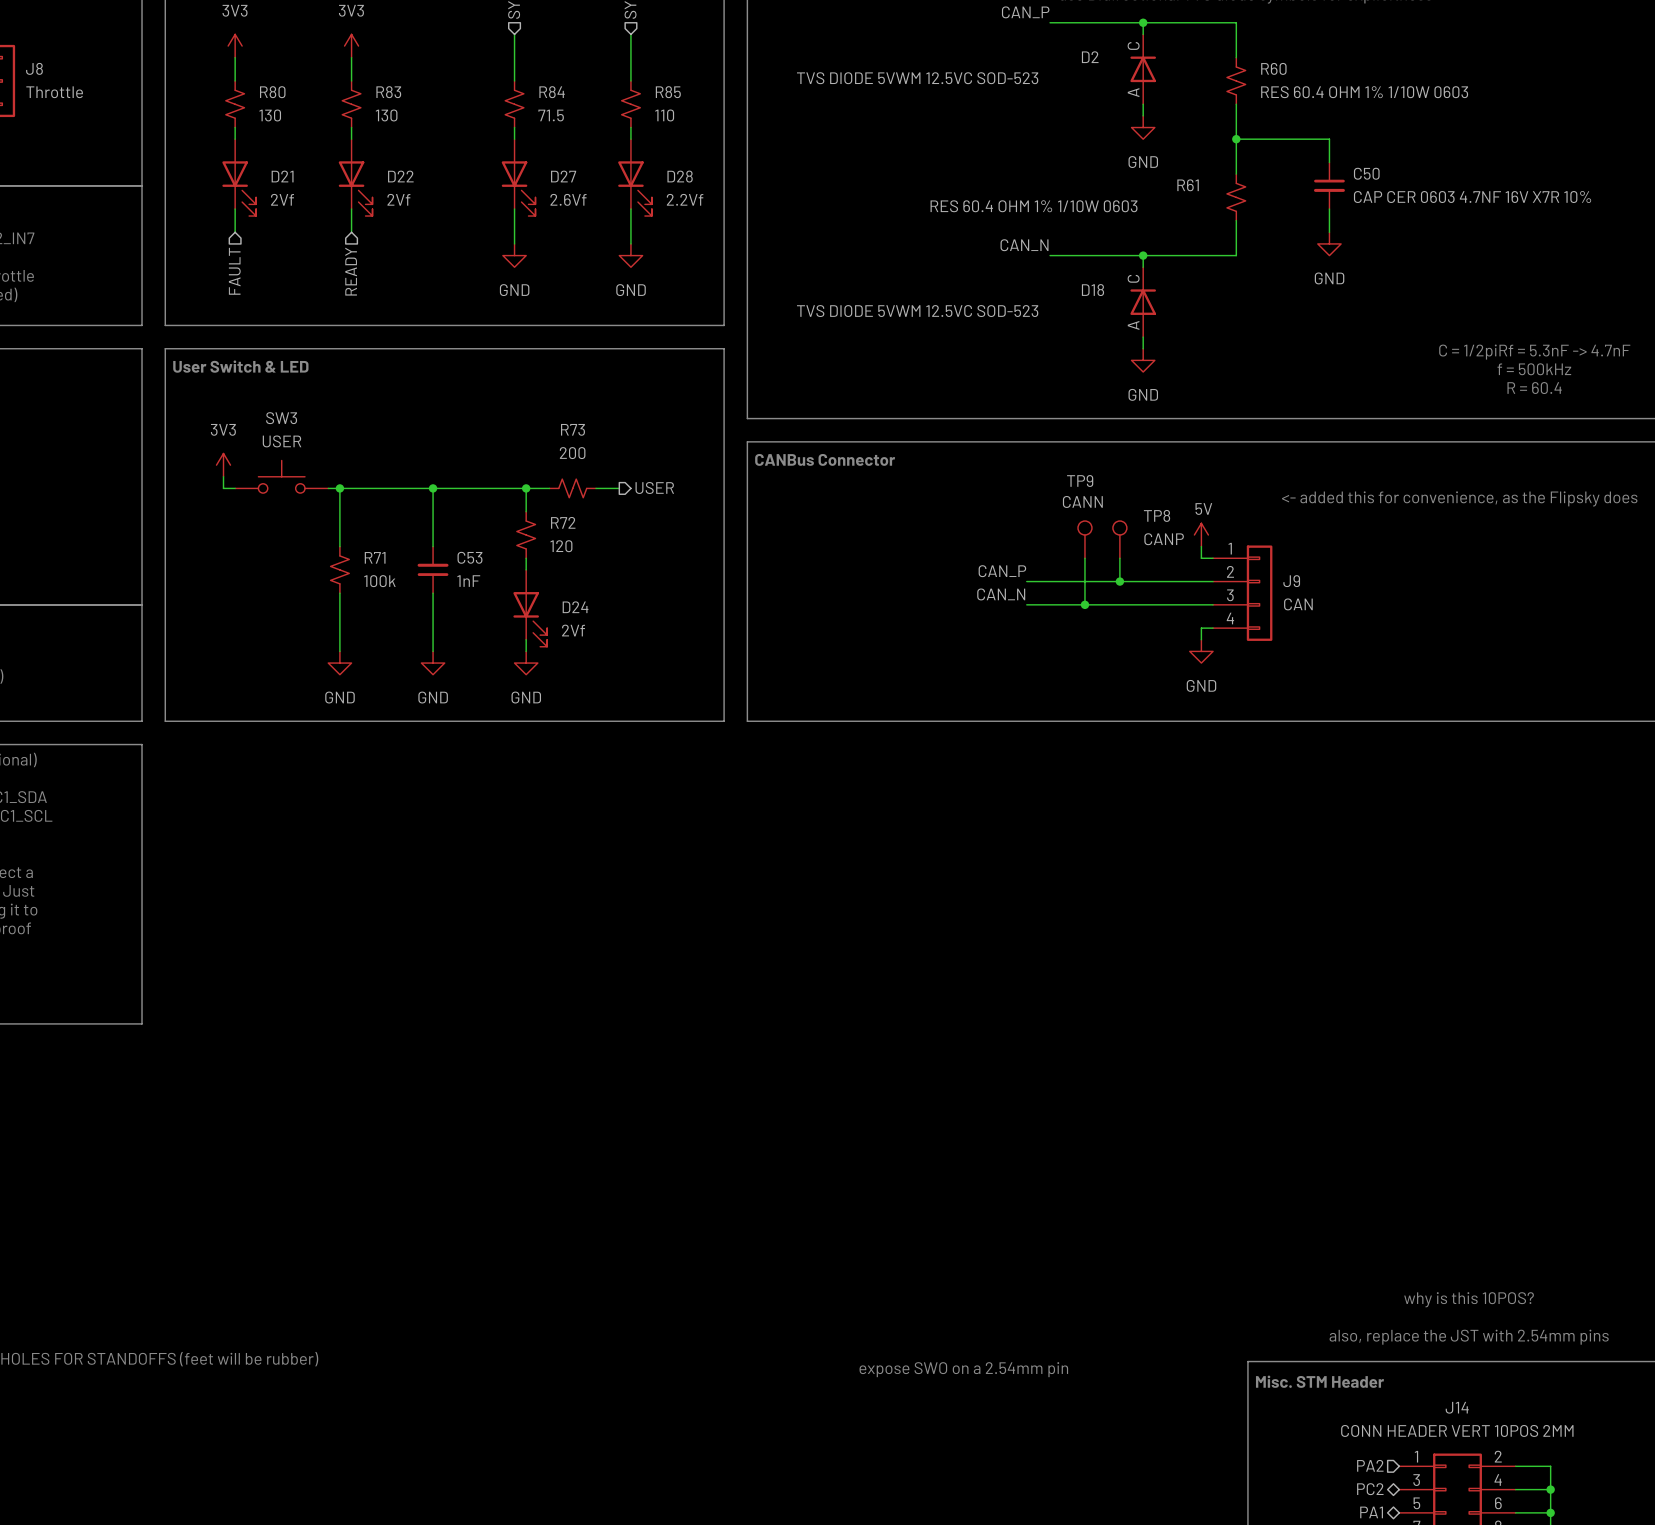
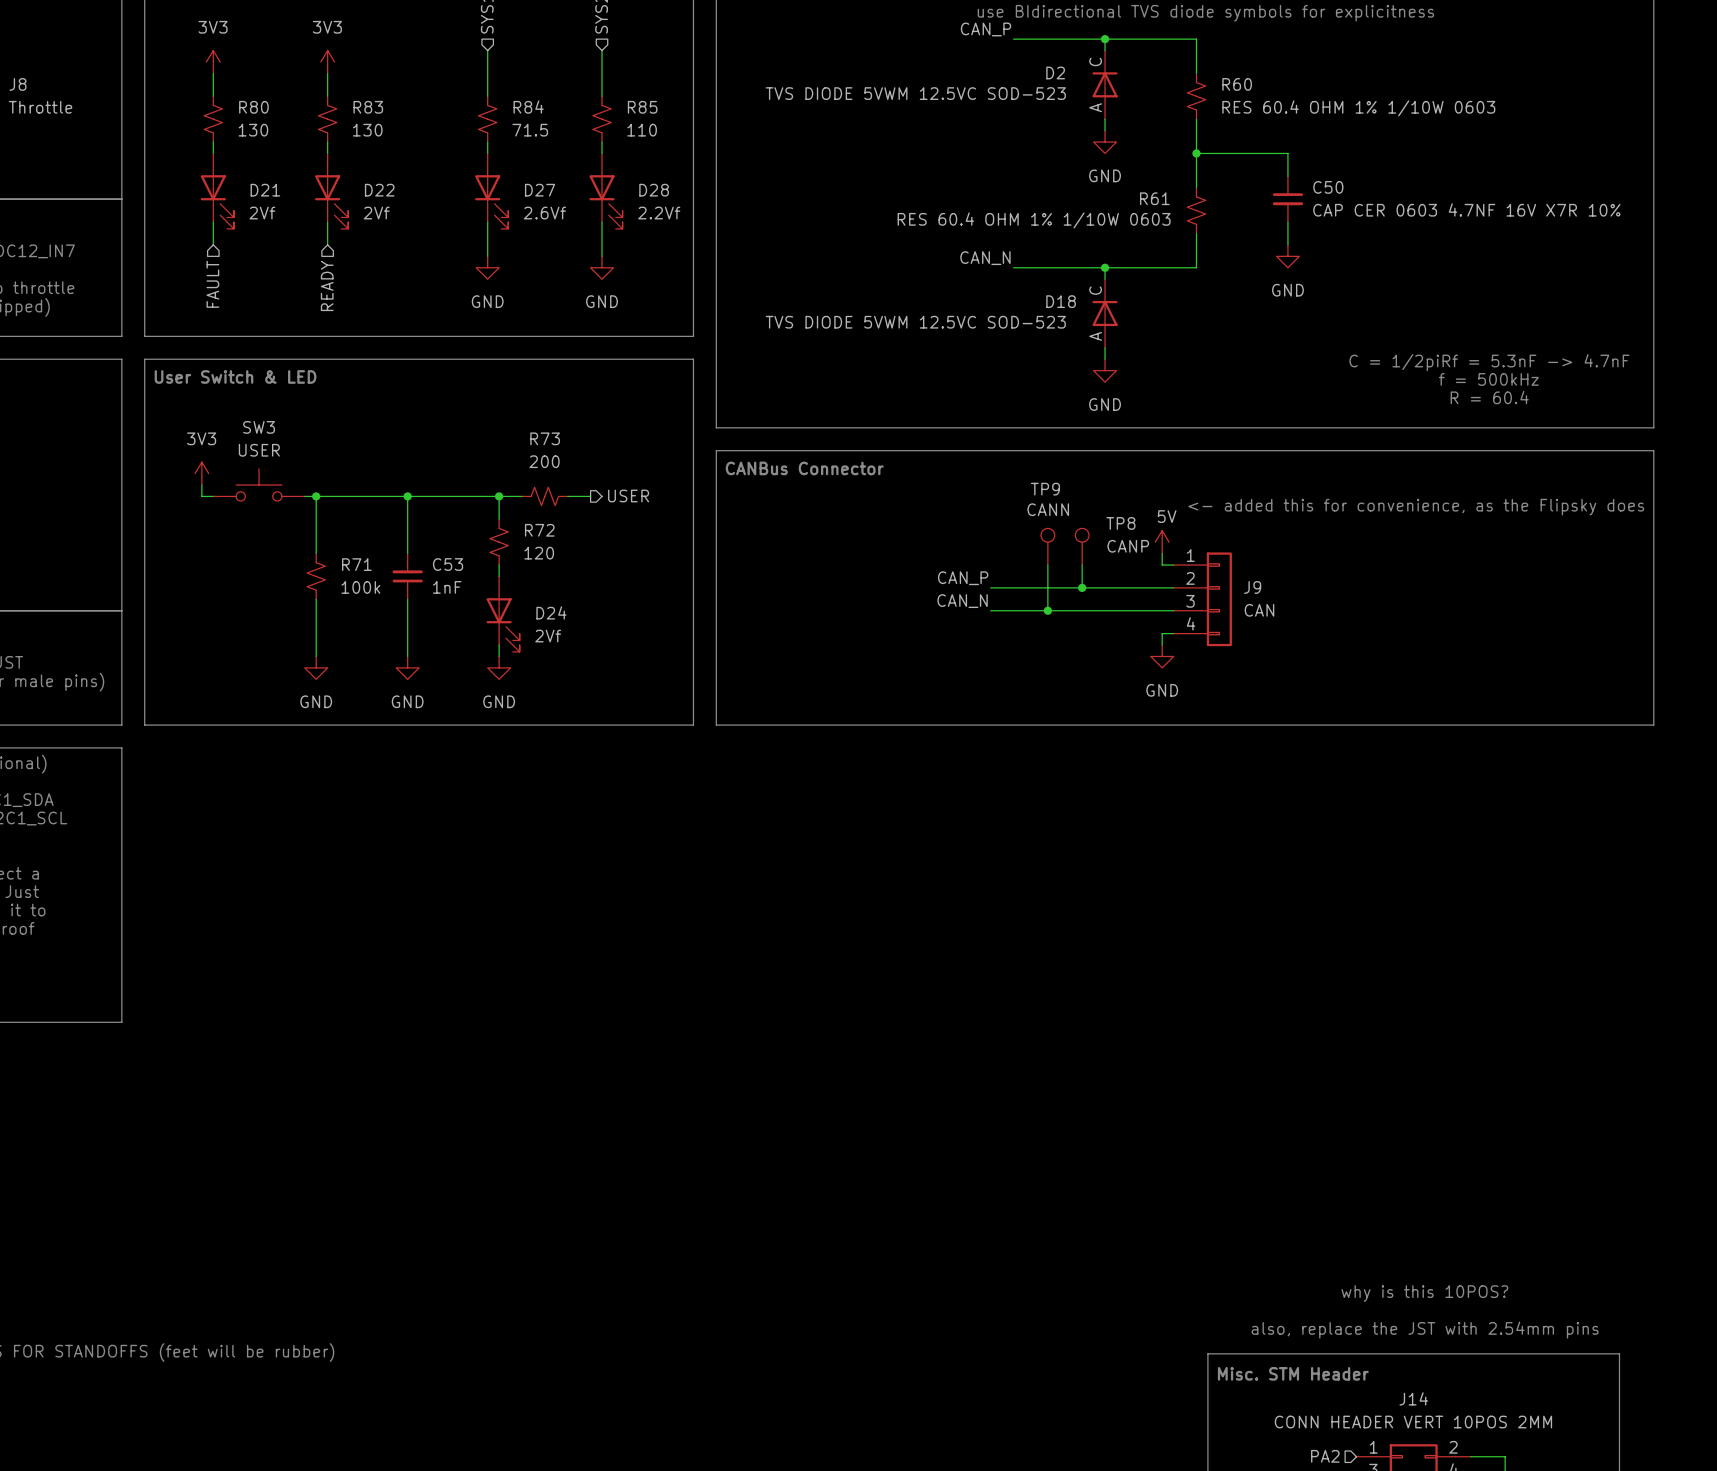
text: expose SWO on a 2.54mm pin (963, 1369) -> none

